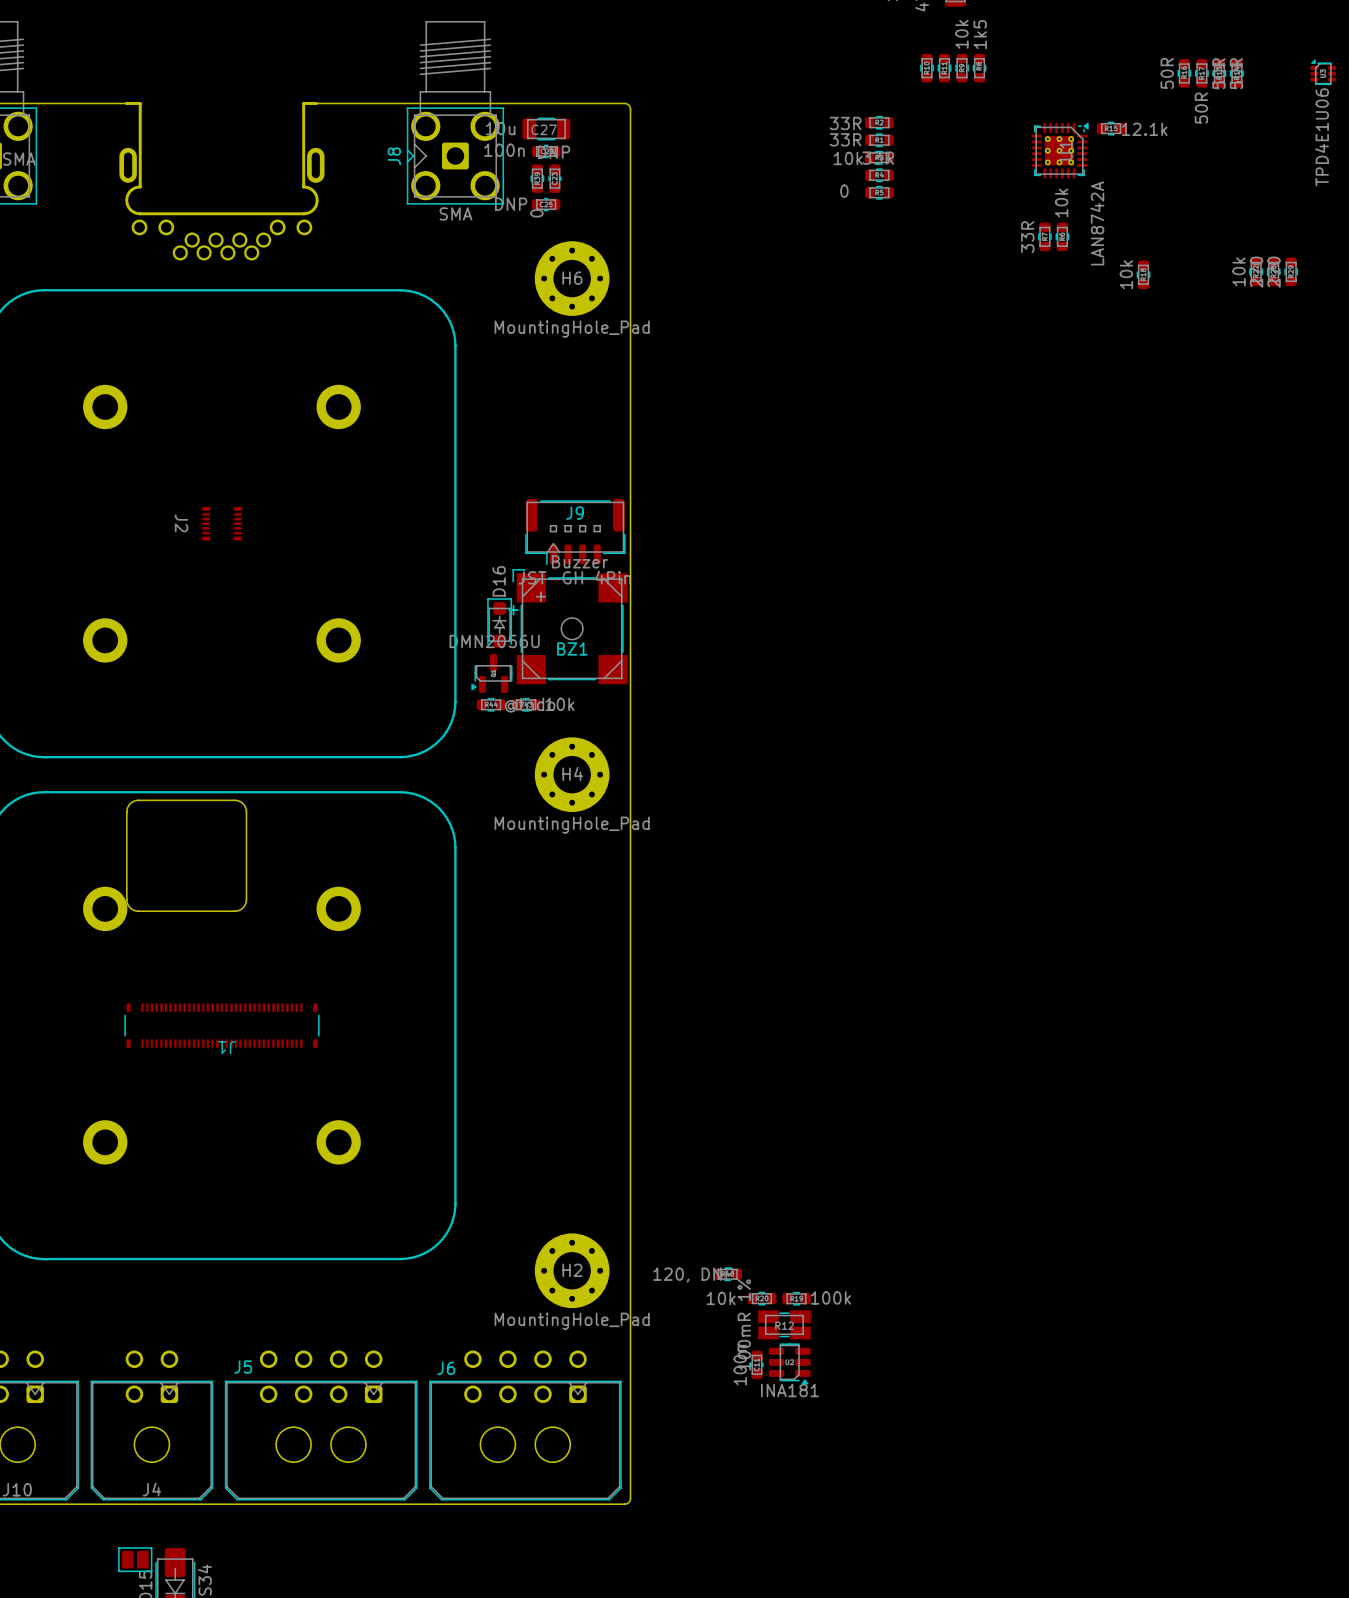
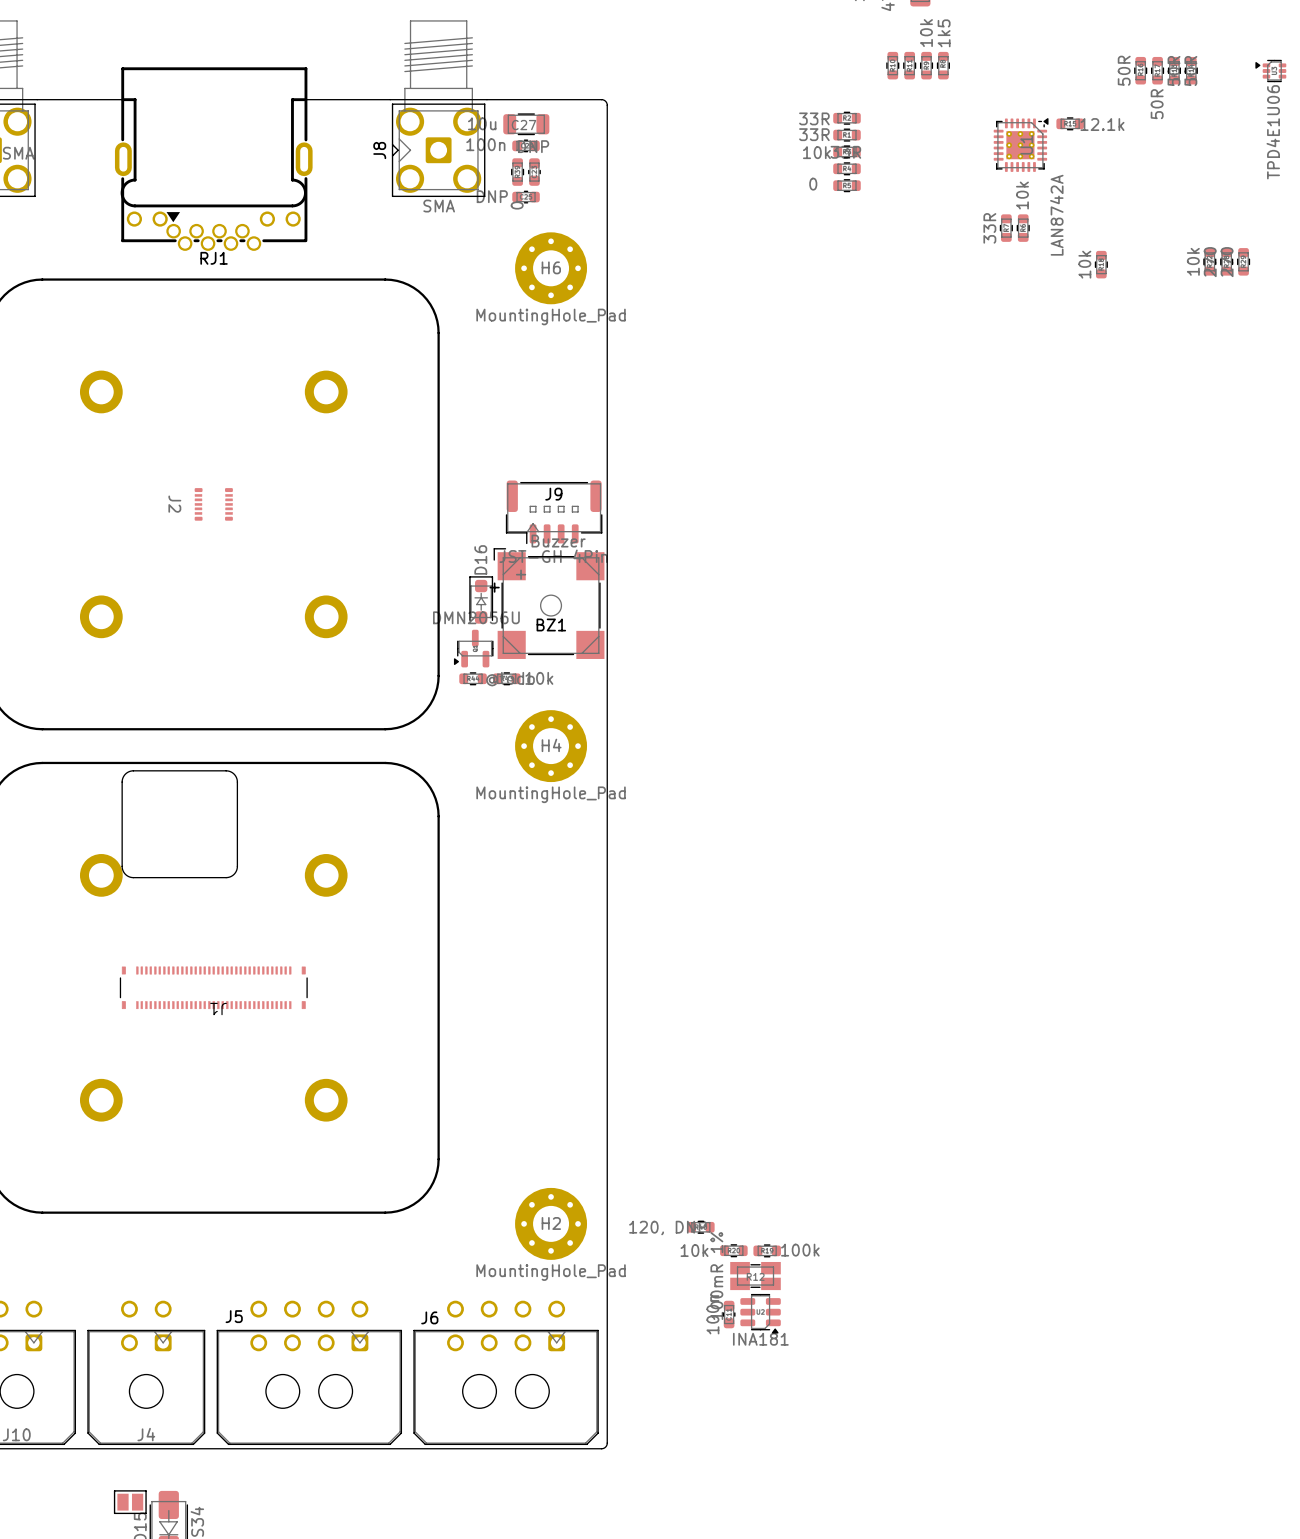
part footprint: [1310, 59, 1337, 85] -> [1255, 59, 1287, 83]
RJ1 side: bottom (221, 181) -> top (213, 159)

